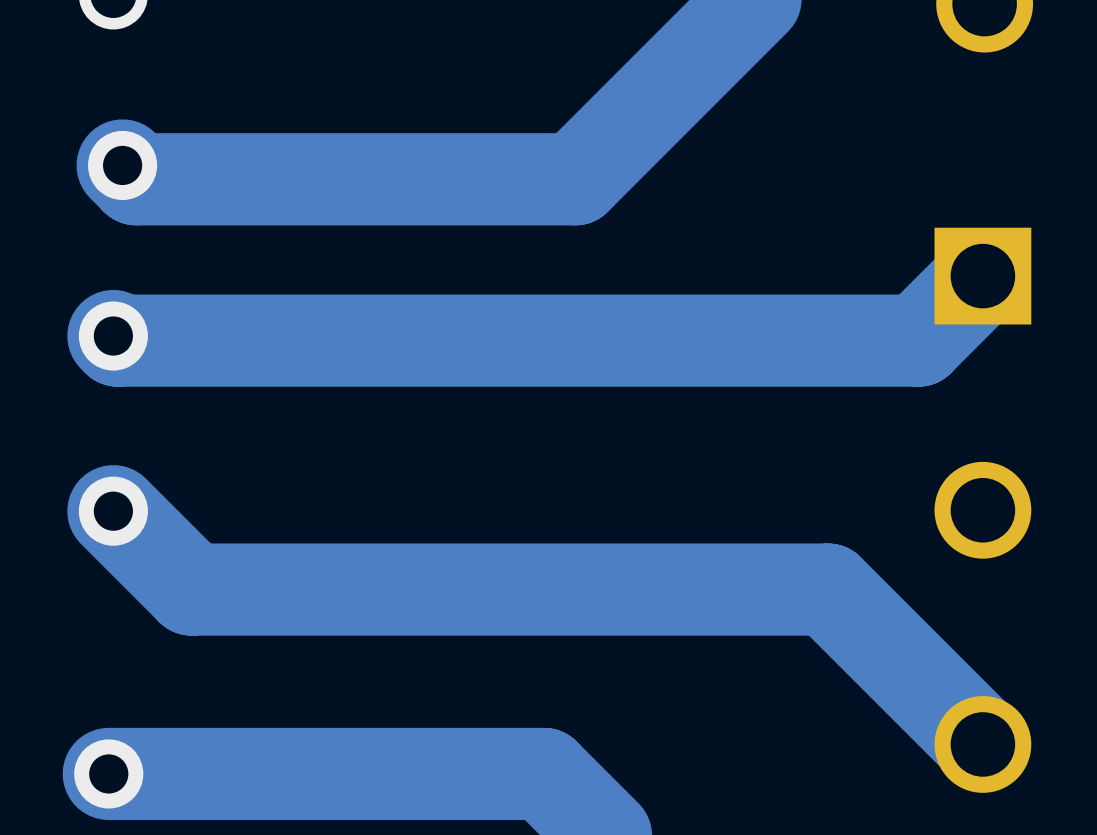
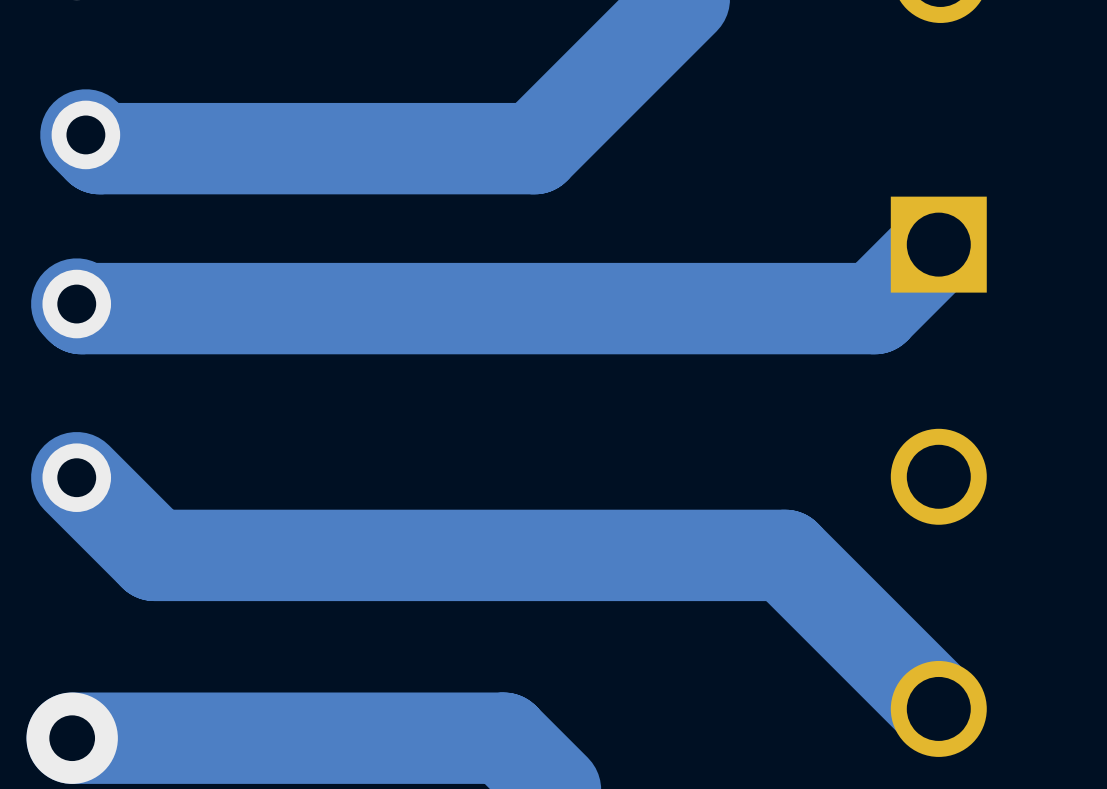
via size: [74, 739, 144, 809] -> [26, 692, 118, 784]

